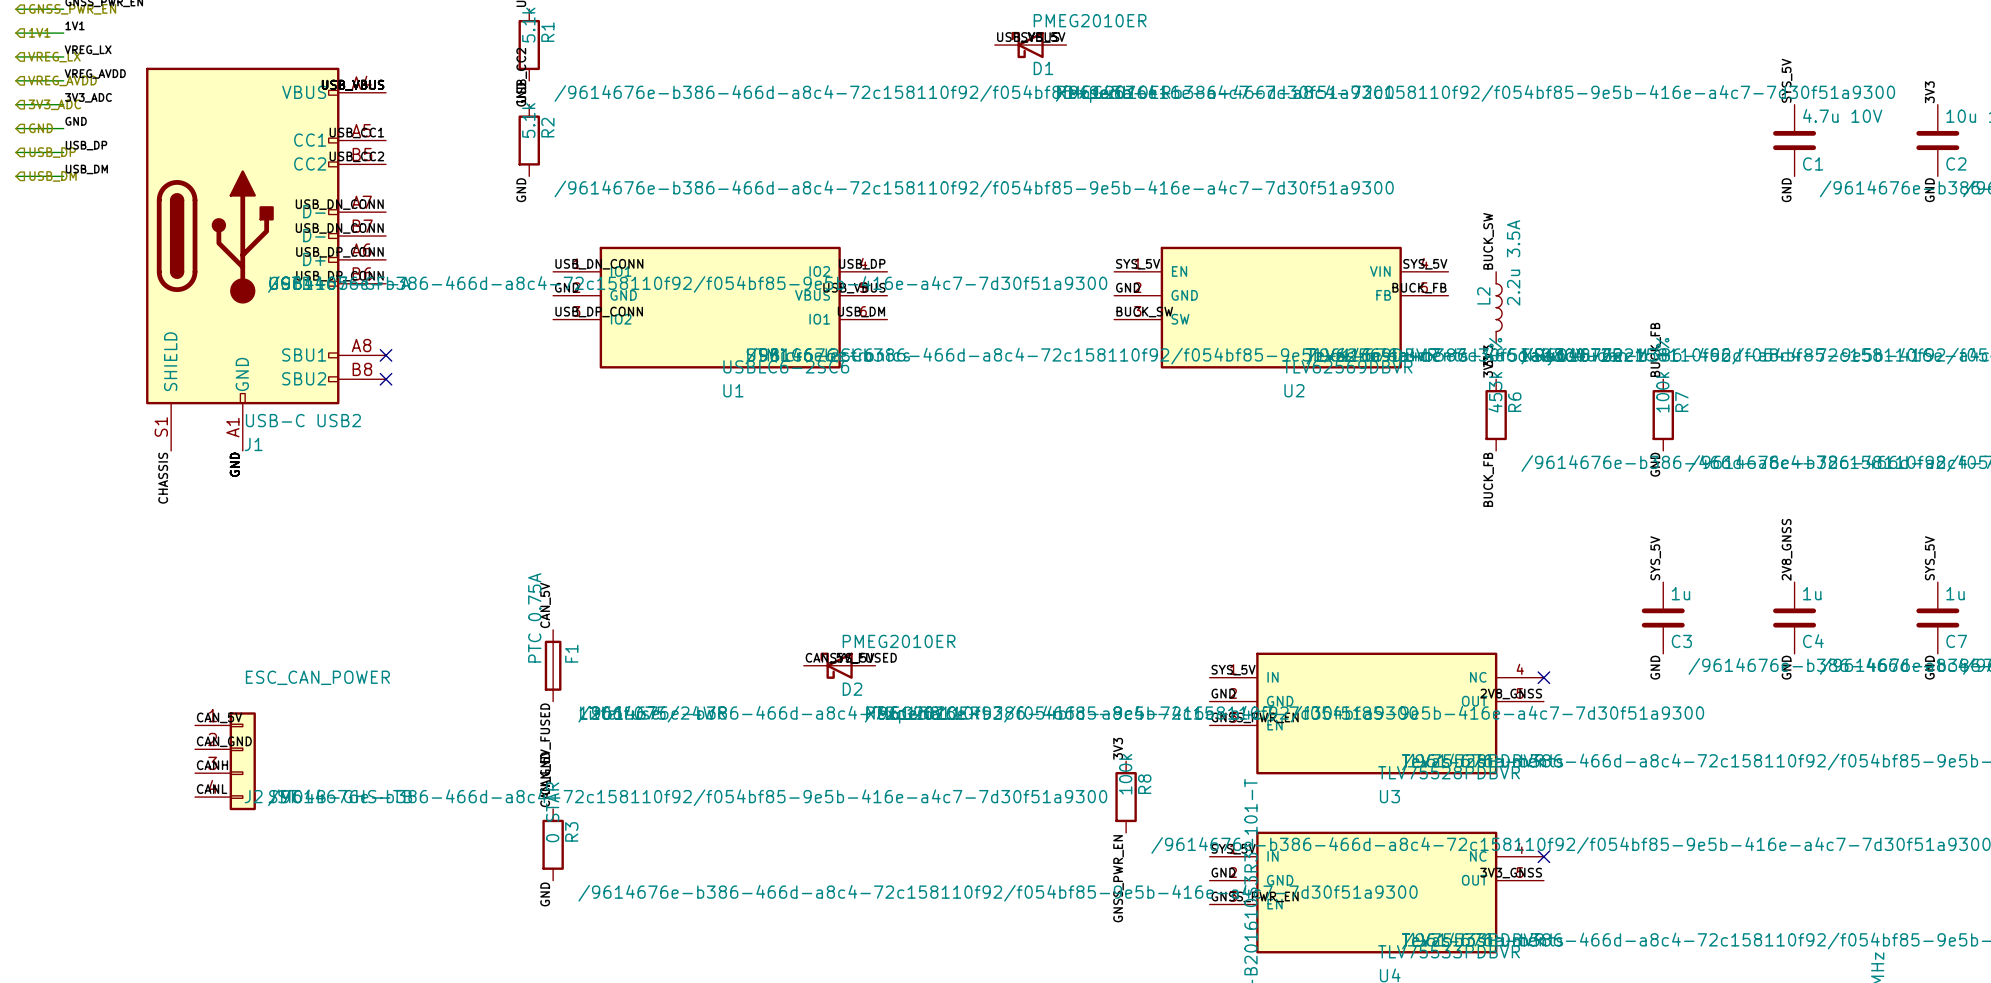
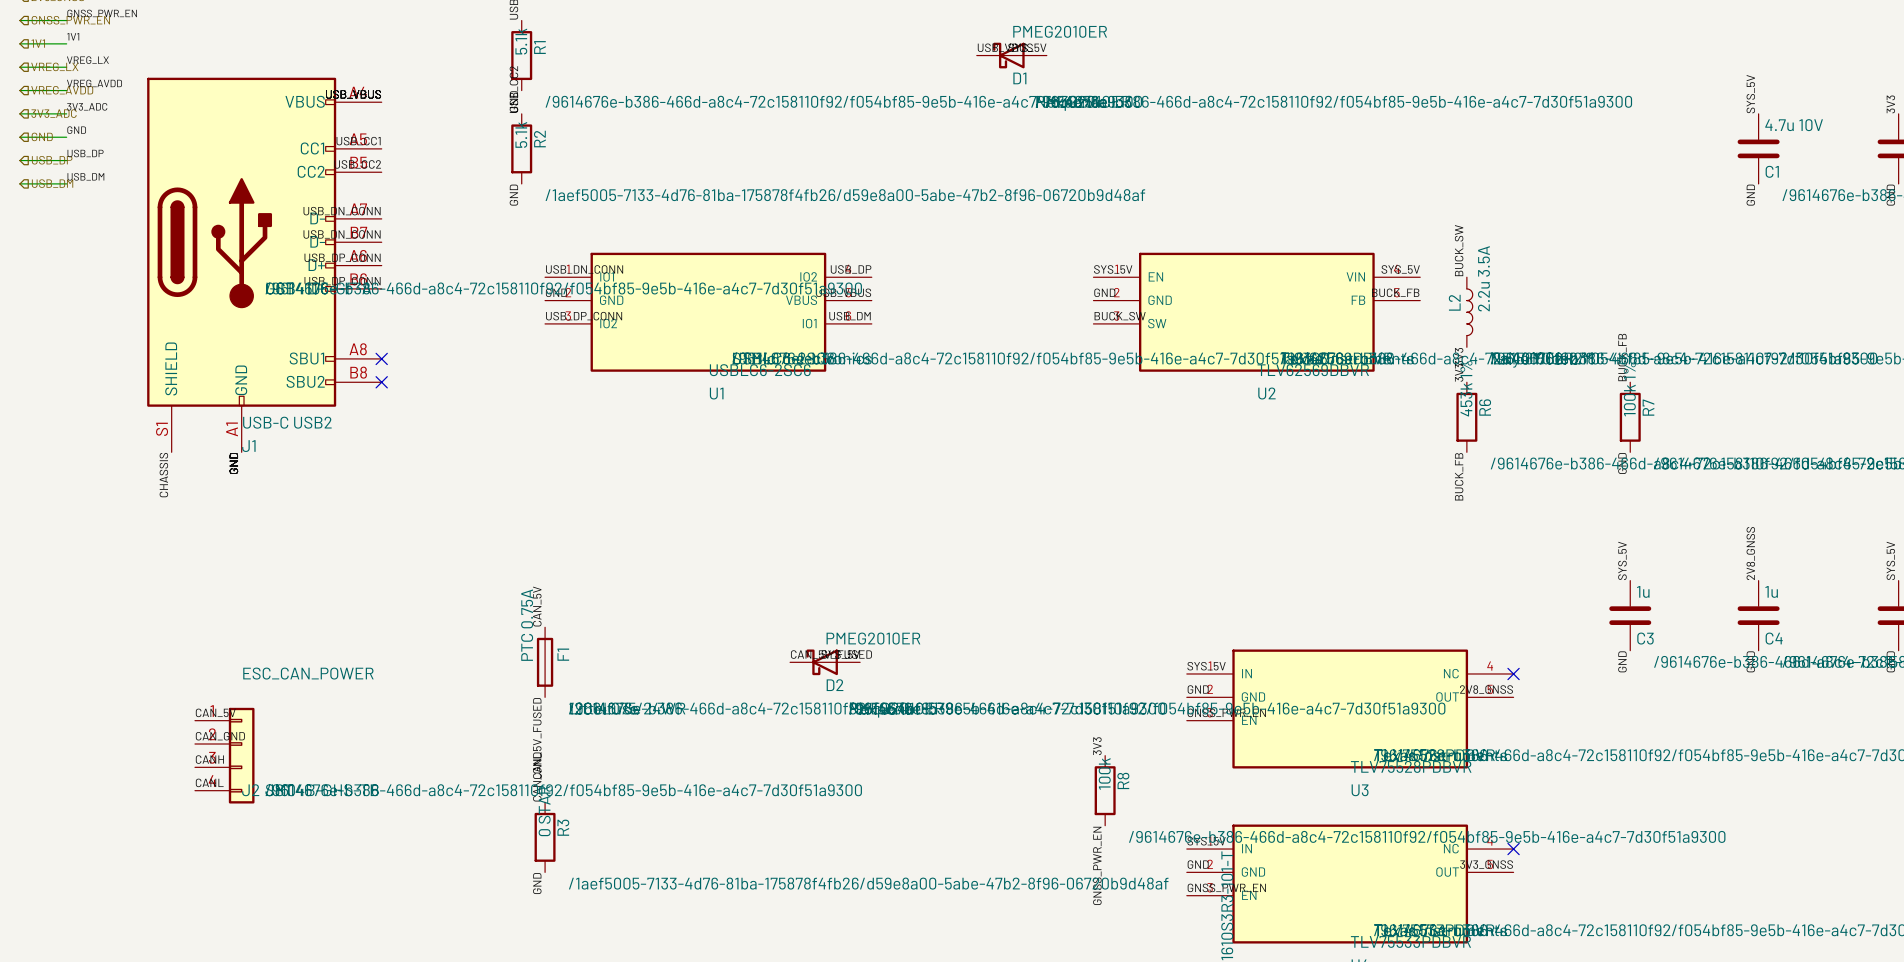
R2 text: /9614676e-b386-466d-a8c4-72c158110f92/f054bf85-9e5b-416e-a4c7-7d30f51a9300 (974, 188) -> /1aef5005-7133-4d76-81ba-175878f4fb26/d59e8a00-5abe-47b2-8f96-06720b9d48af (845, 195)
R3 text: /9614676e-b386-466d-a8c4-72c158110f92/f054bf85-9e5b-416e-a4c7-7d30f51a9300 (998, 893) -> /1aef5005-7133-4d76-81ba-175878f4fb26/d59e8a00-5abe-47b2-8f96-06720b9d48af (868, 883)

